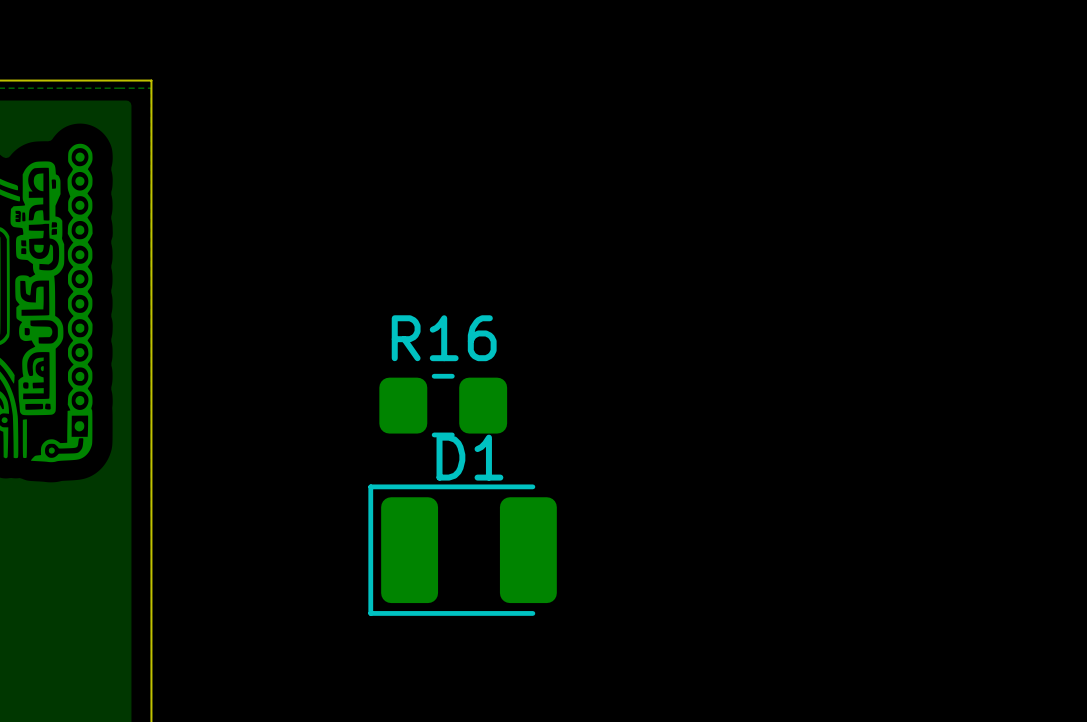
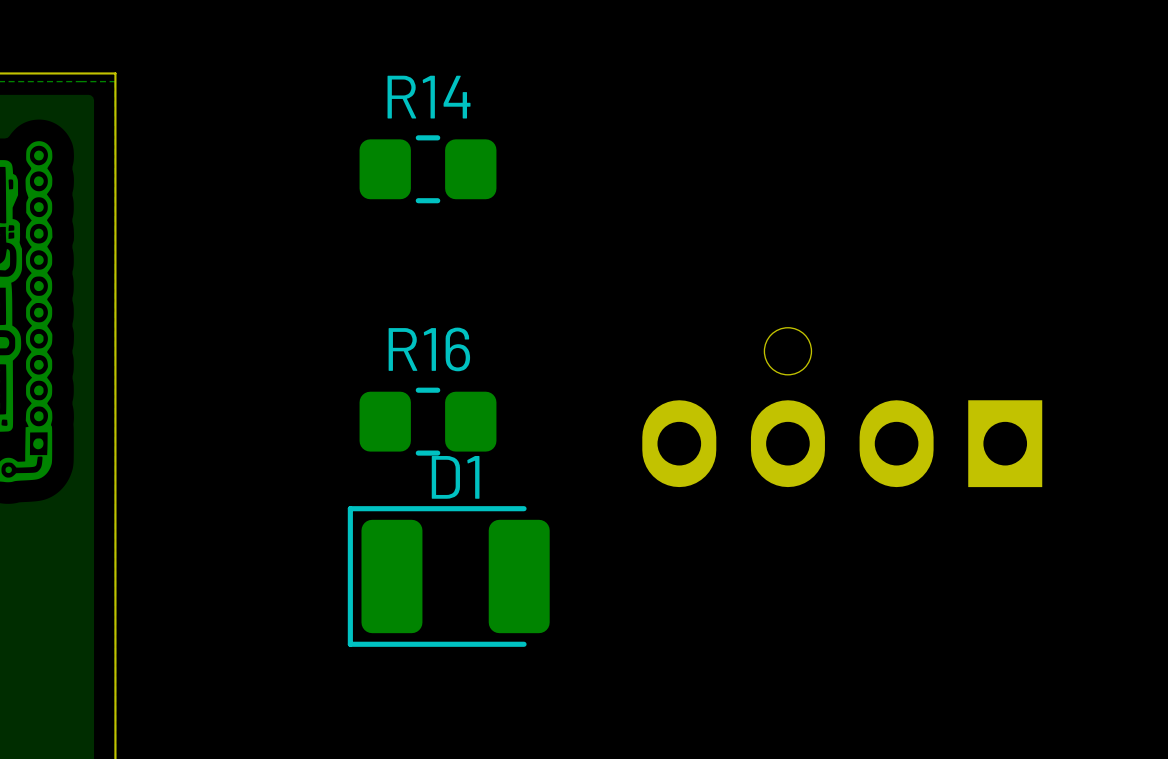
R14: none -> (428, 169)
part: none -> (842, 407)

